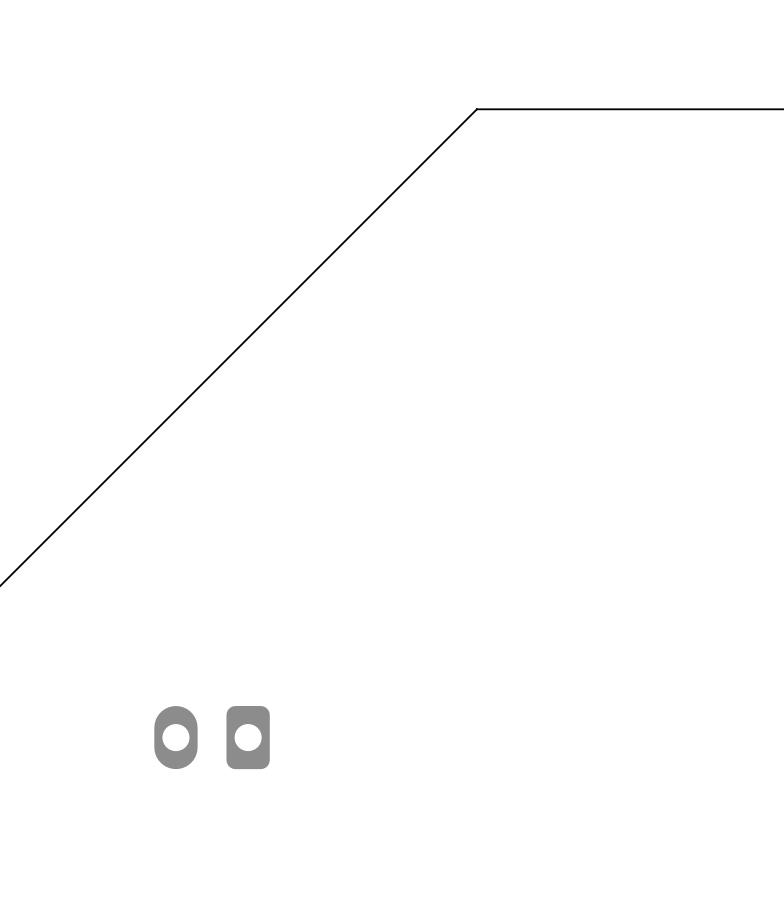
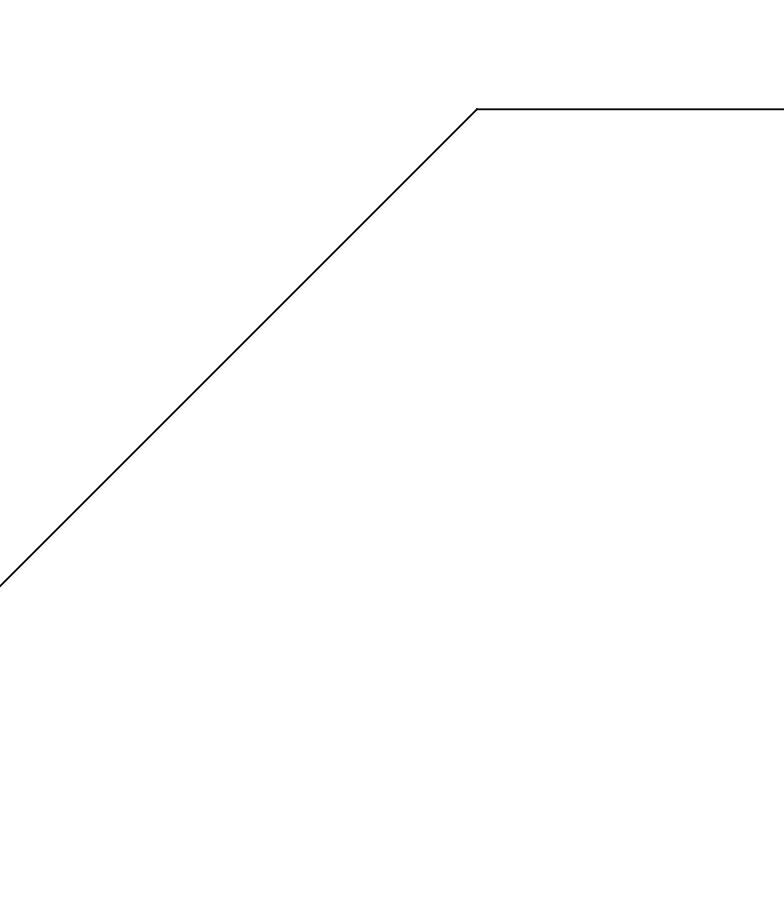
part: (212, 737) -> none

